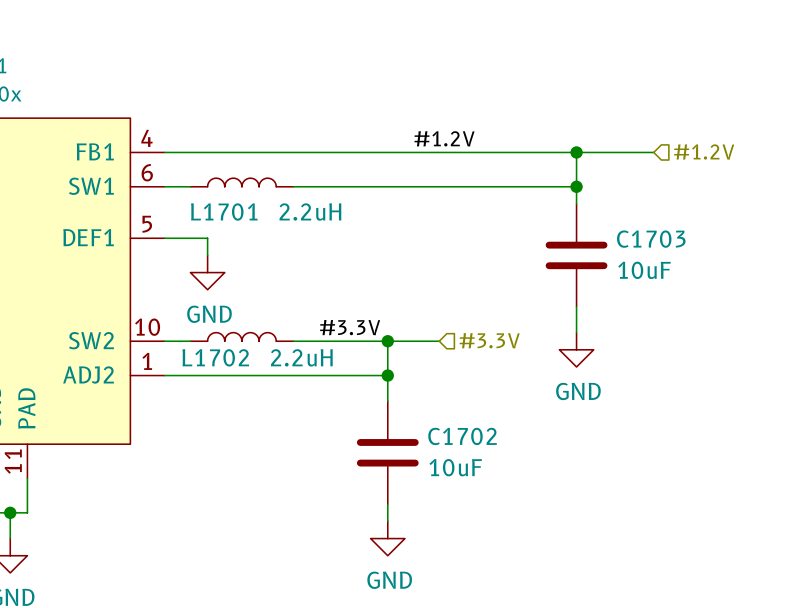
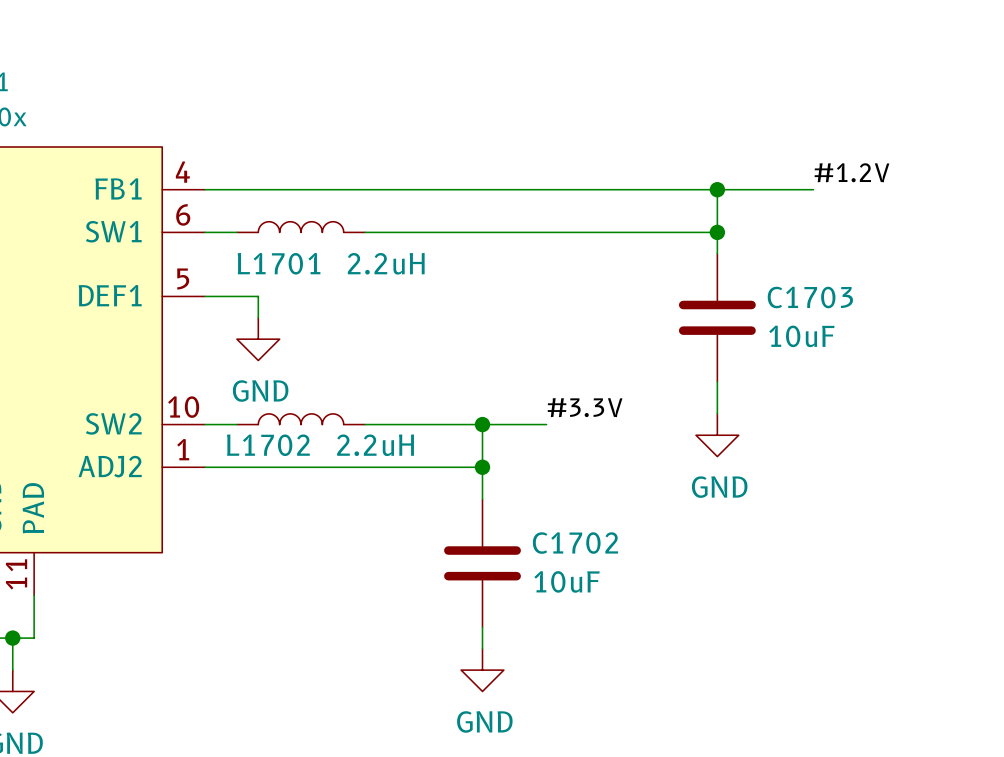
label position: #1.2V (444, 138) -> #1.2V (852, 172)
hierarchical label: #1.2V (704, 152) -> none
label position: #3.3V (350, 327) -> #3.3V (585, 407)
hierarchical label: #3.3V (489, 340) -> none

